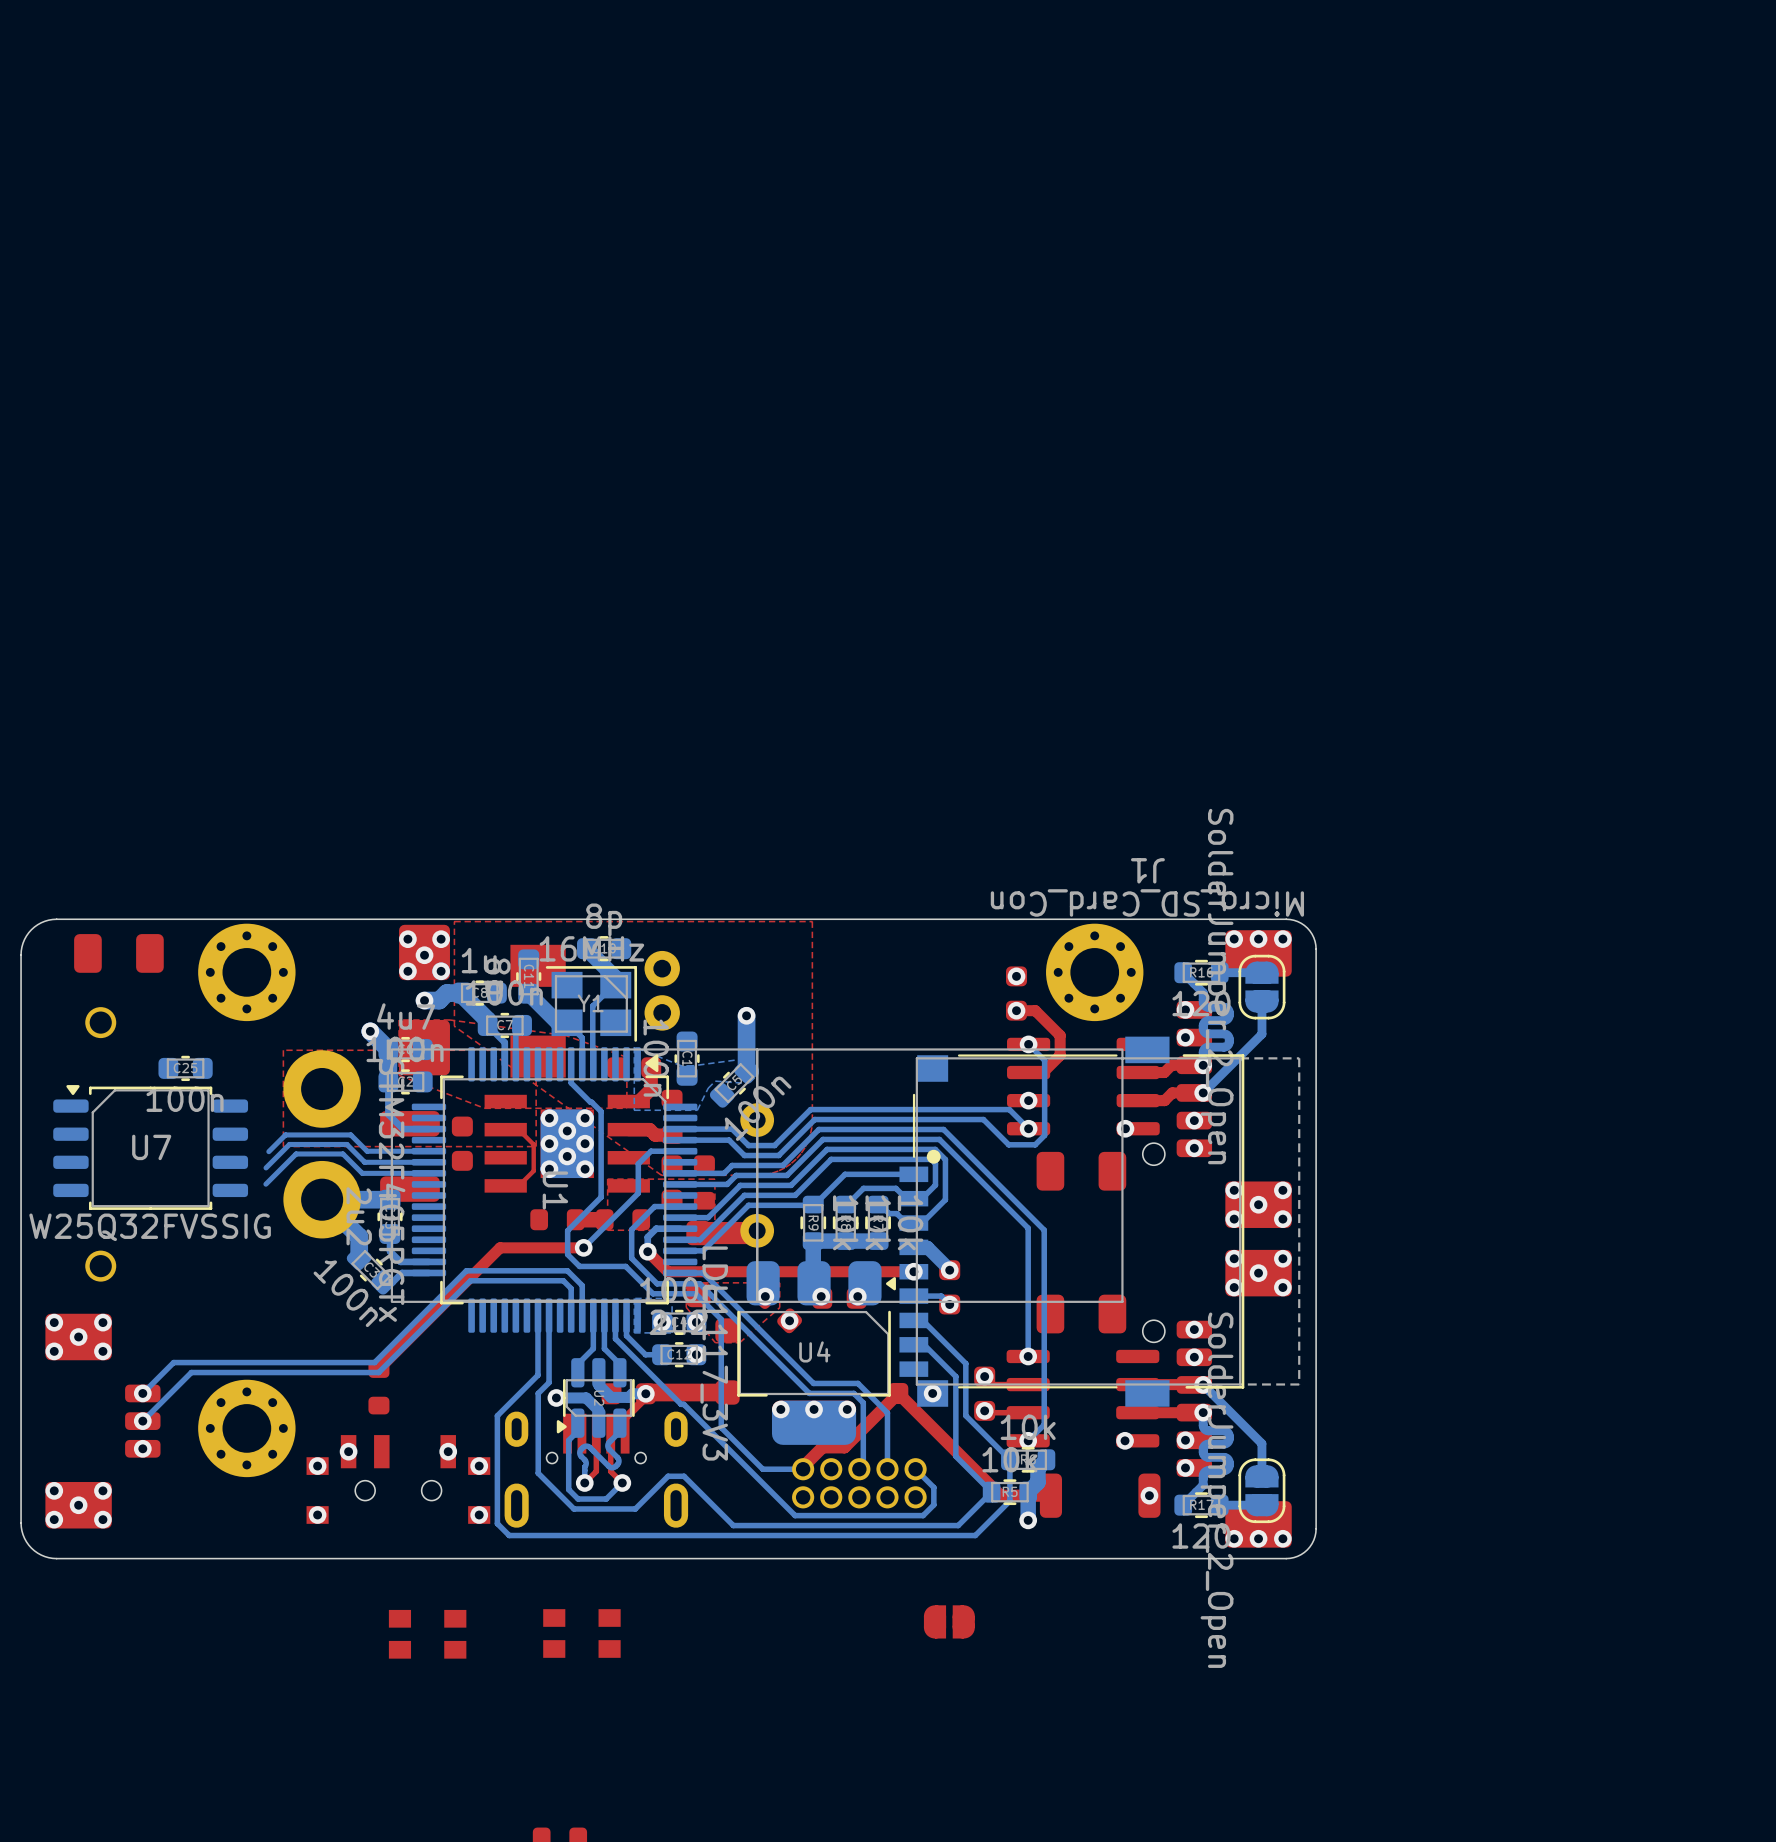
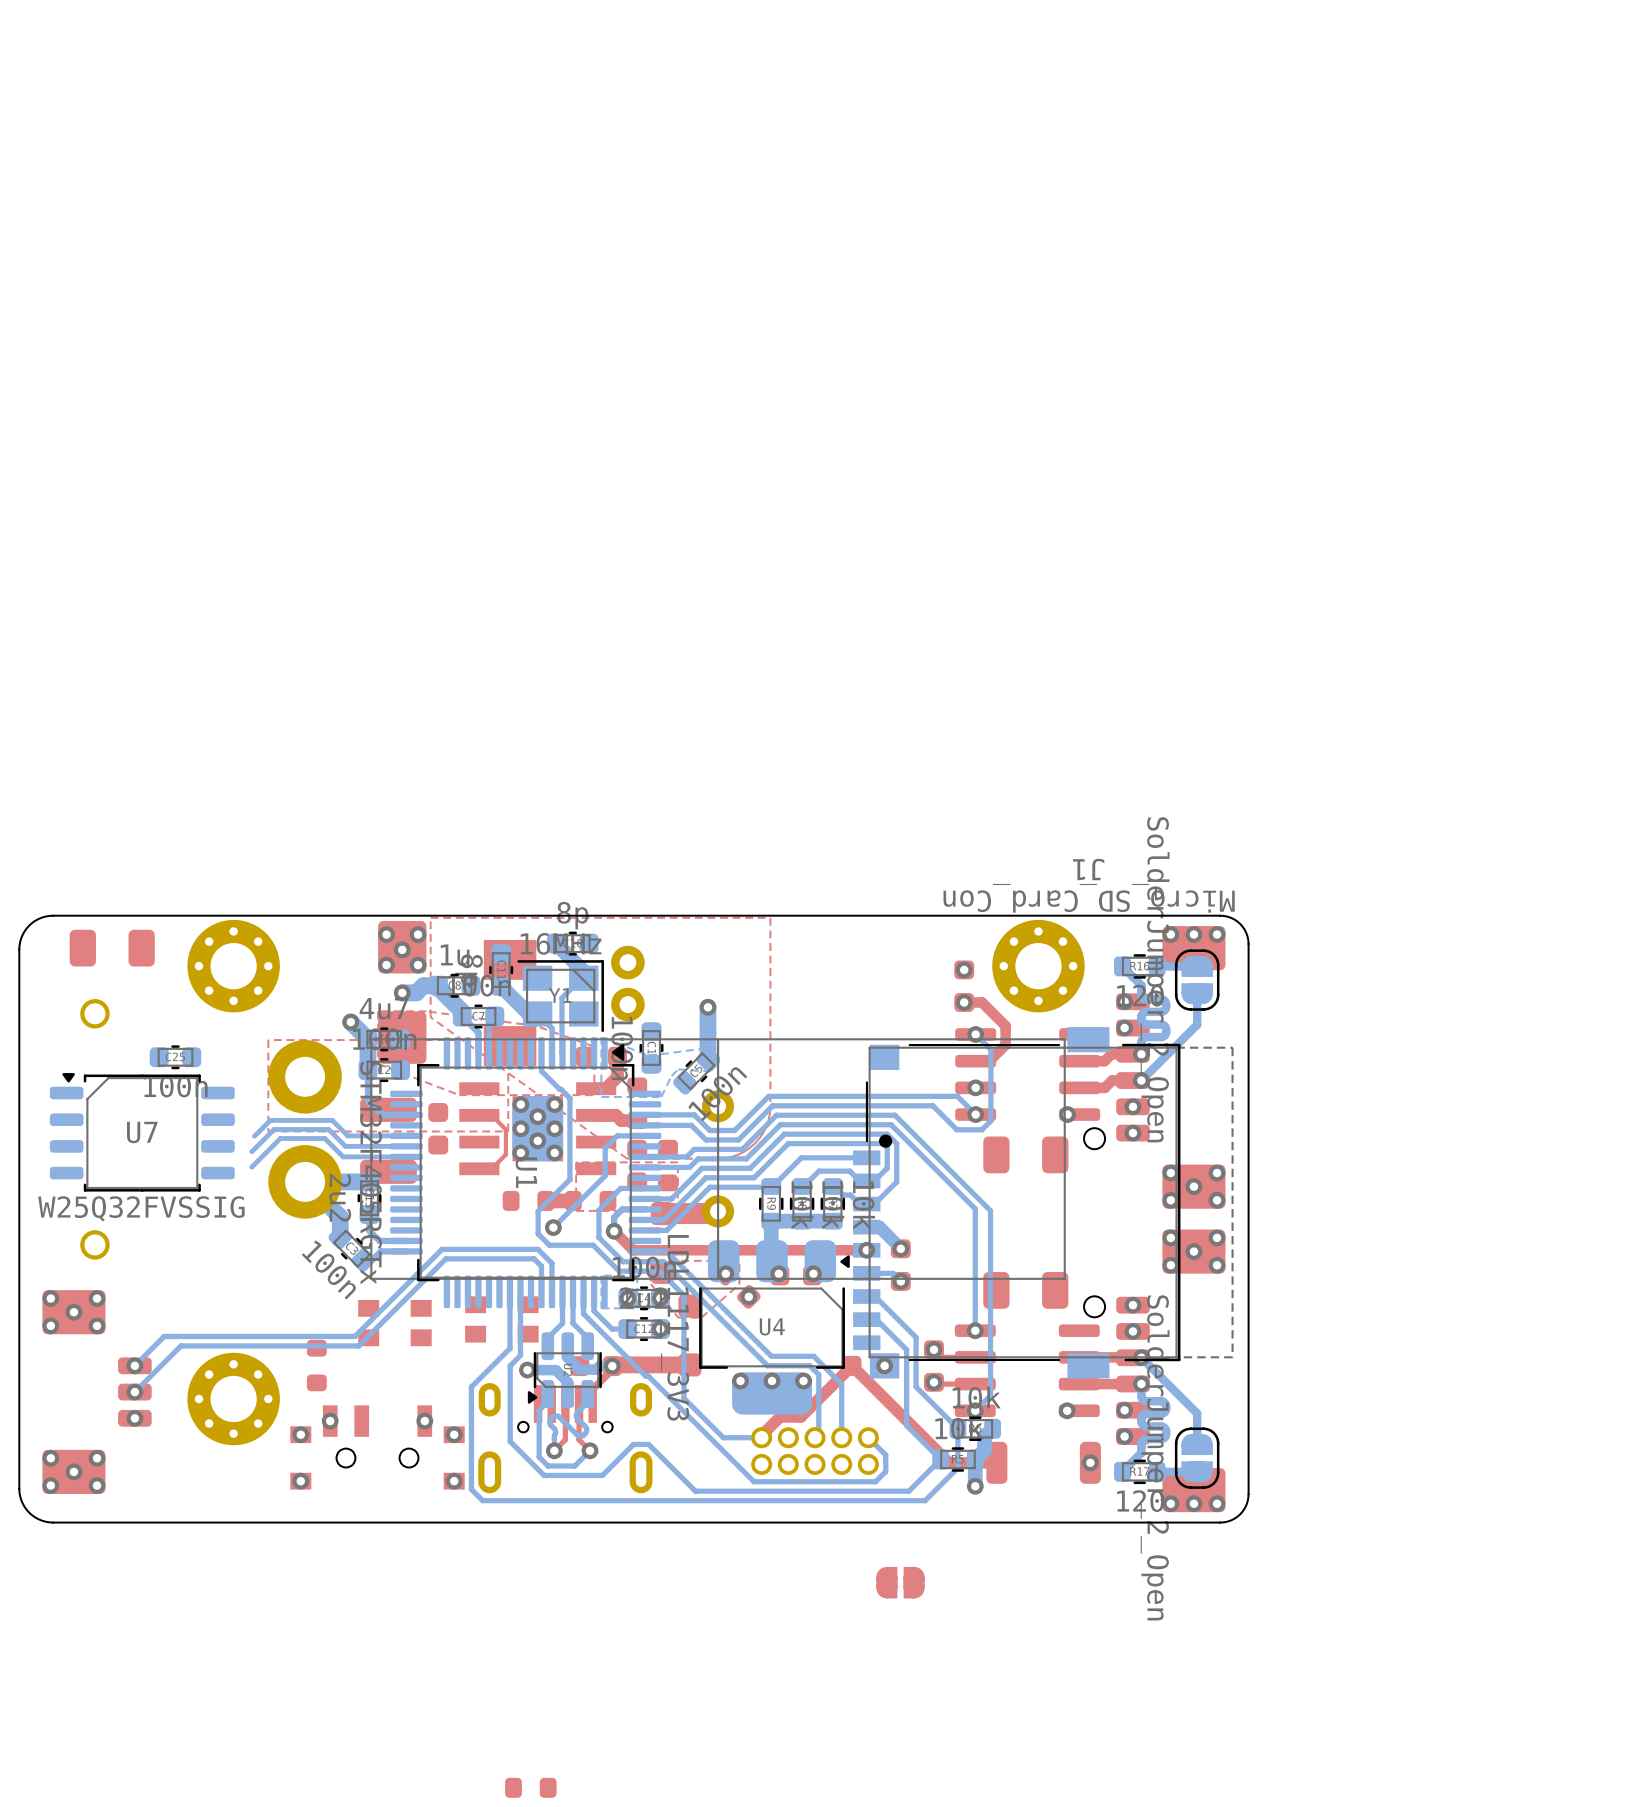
top track: (583, 1247) (500, 1247) (378, 1369) -> none
part: none -> (501, 1319)
part: none -> (394, 1323)
part position: (378, 1387) -> (316, 1365)
part: (581, 1633) -> none
part: (427, 1634) -> none

